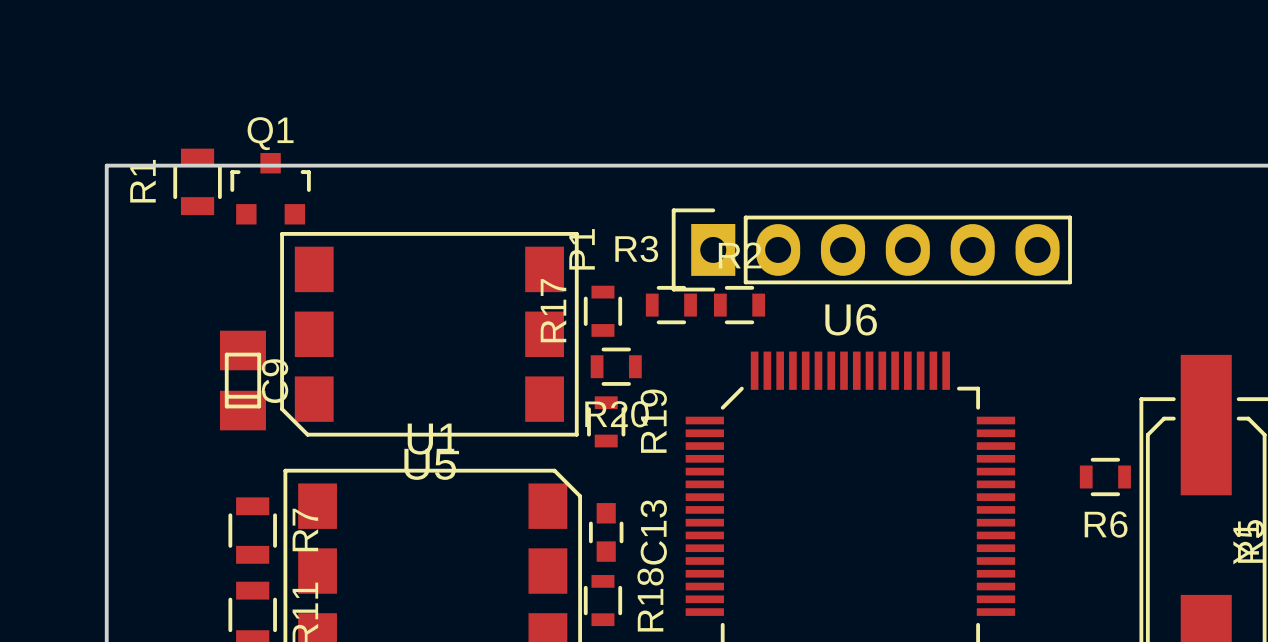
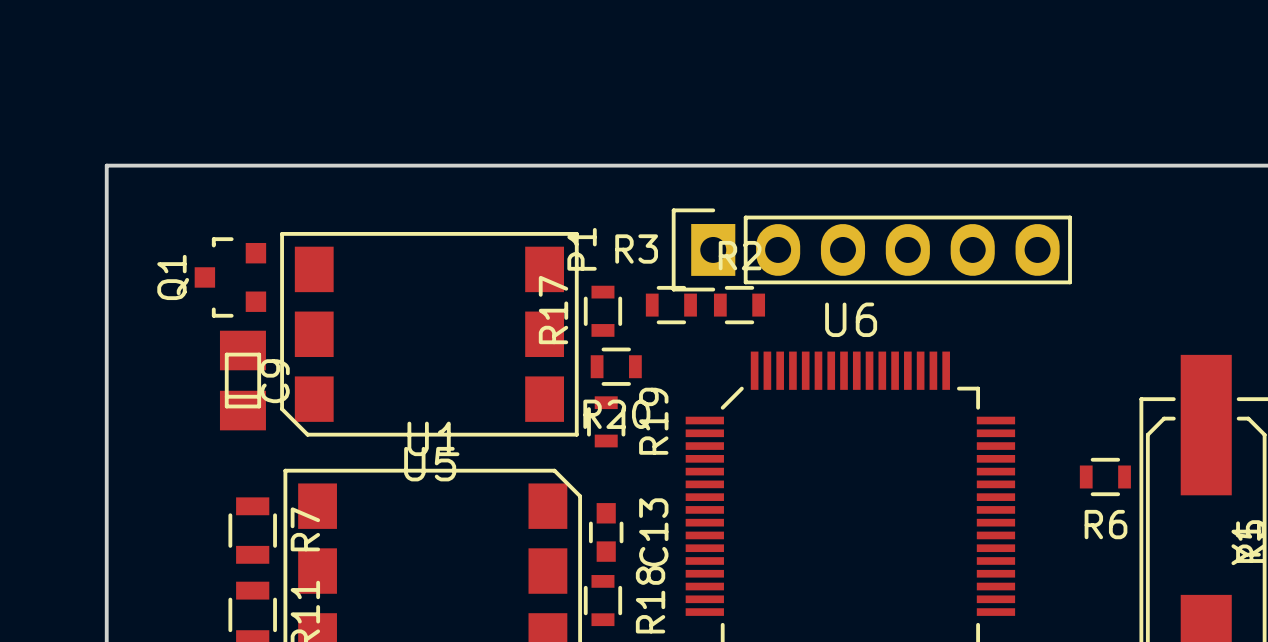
R1: (197, 181) -> none
Q1 rotation: 0° (270, 188) -> 90° counterclockwise (230, 277)
Q1 position: (270, 188) -> (230, 277)

